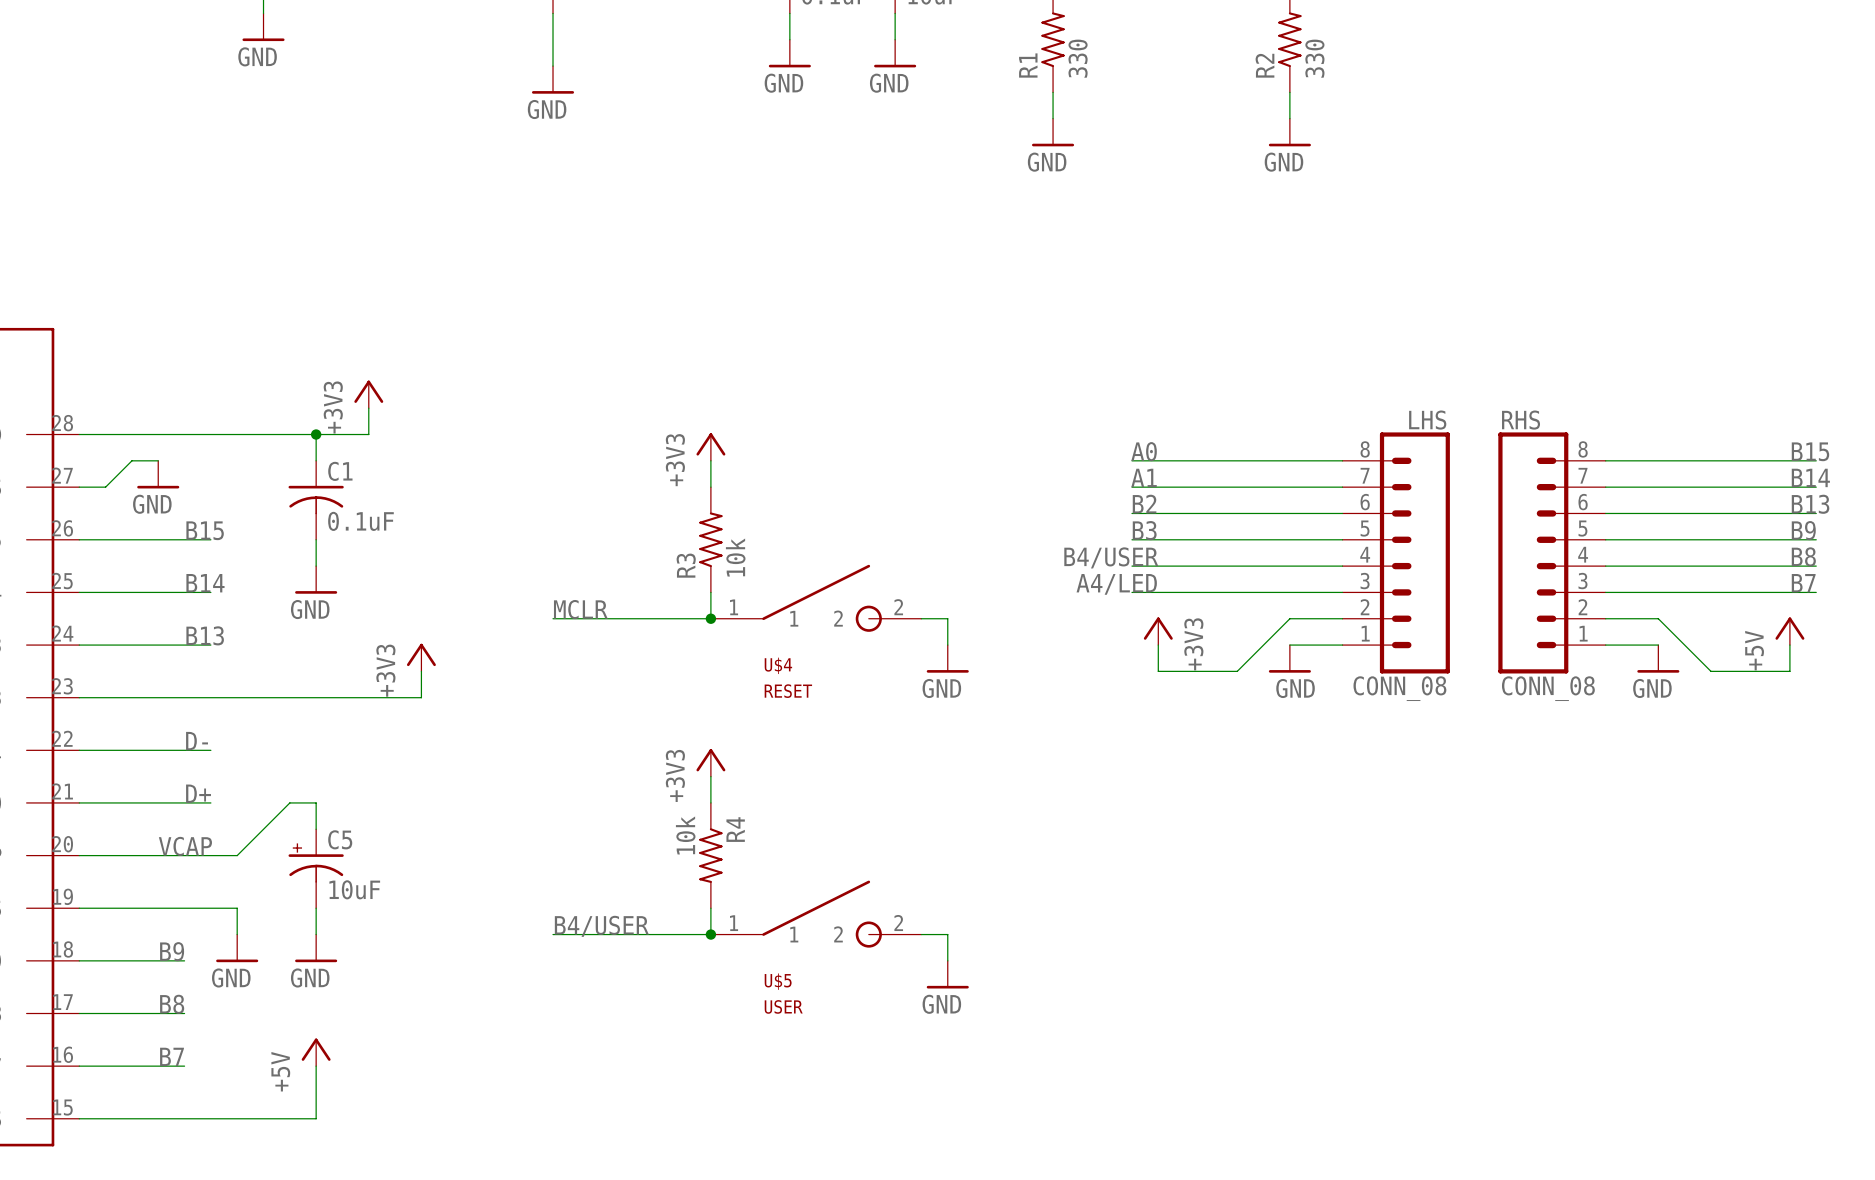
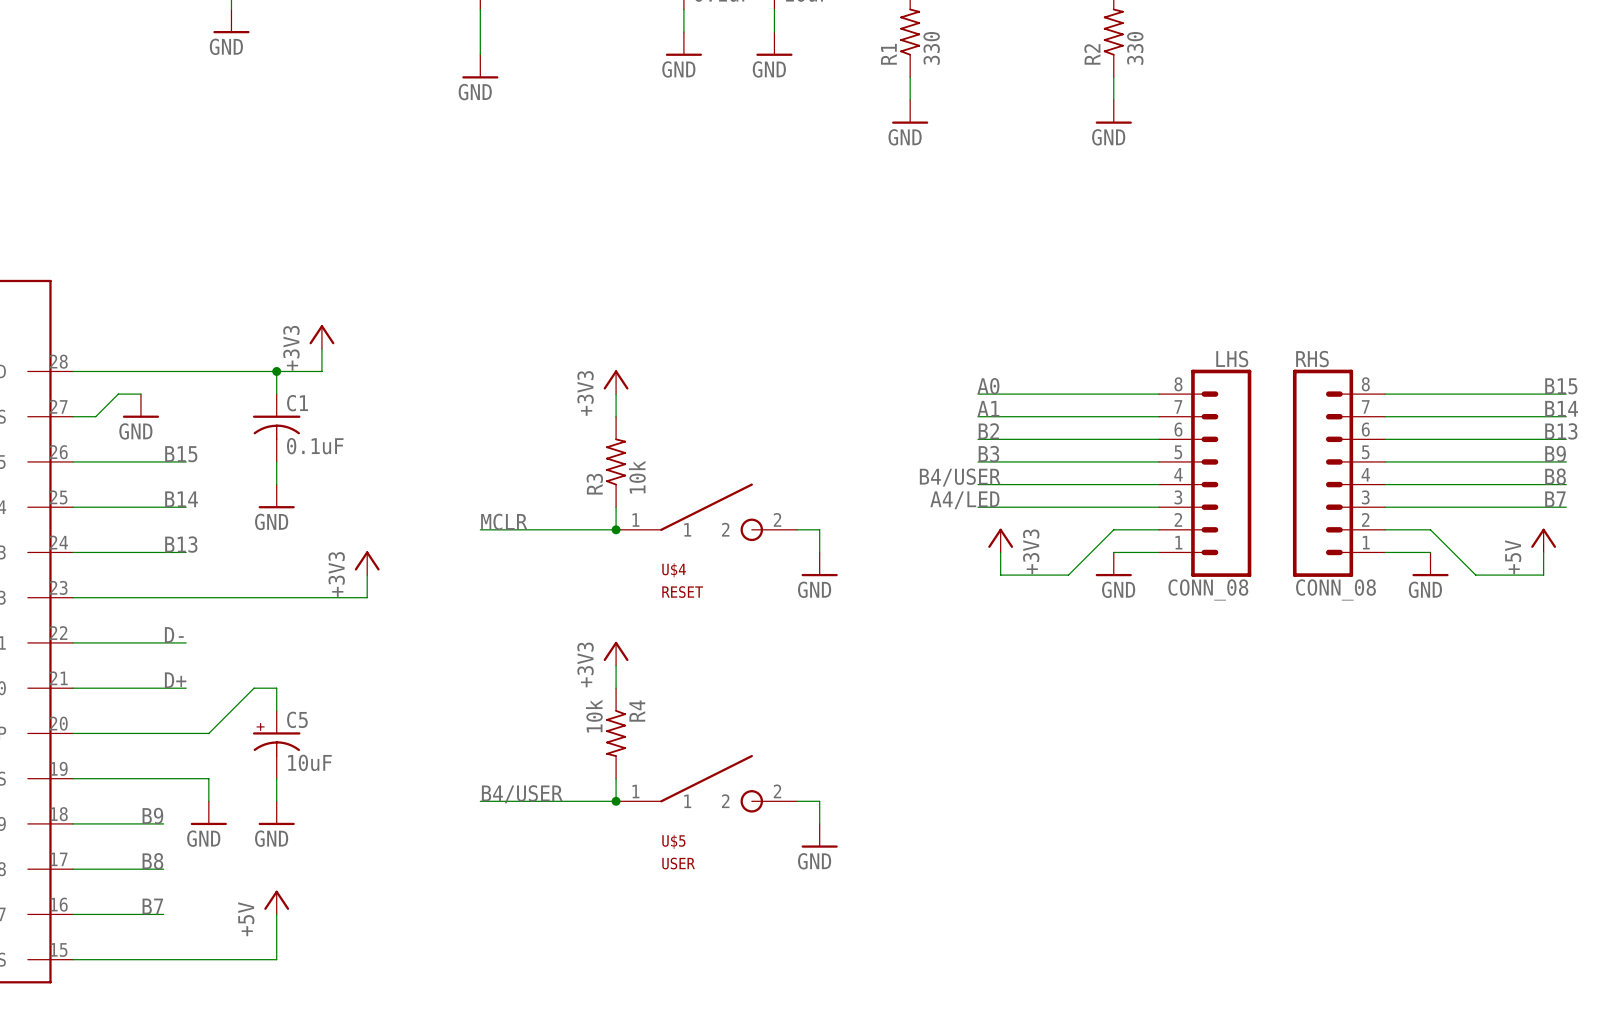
label: VCAP (185, 846) -> none

